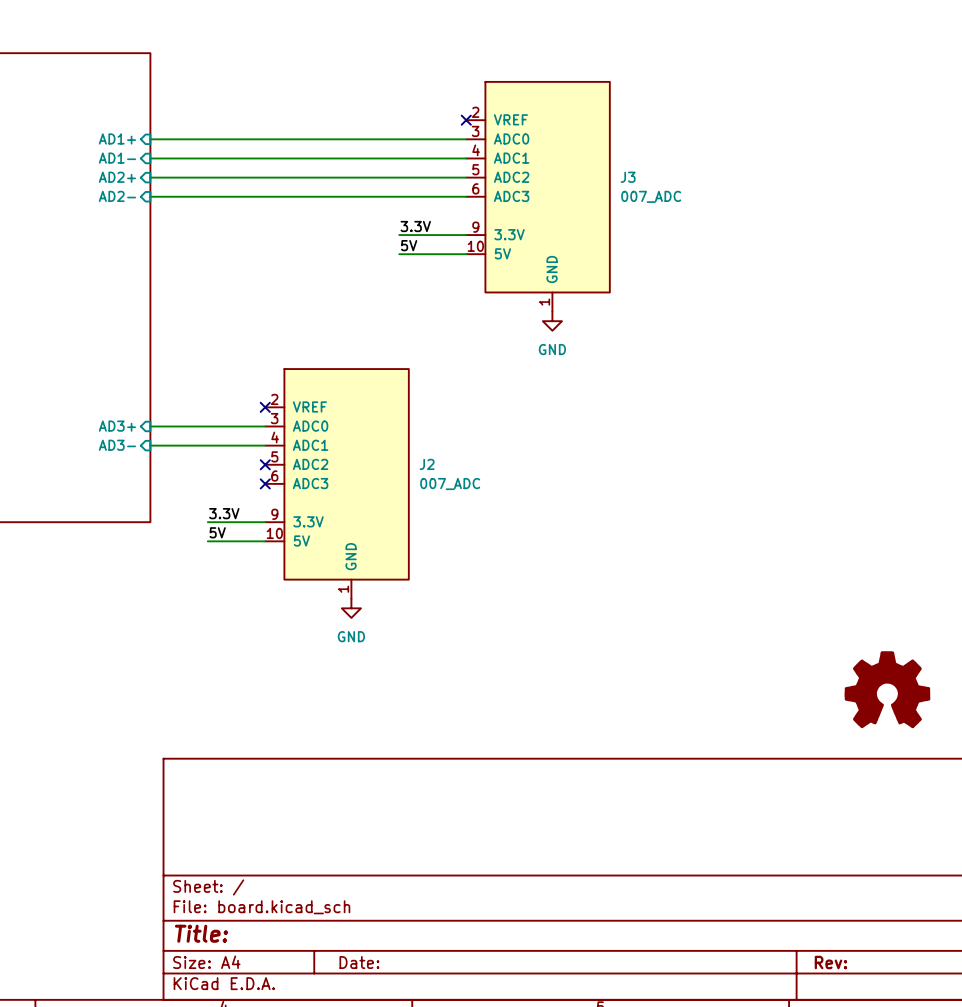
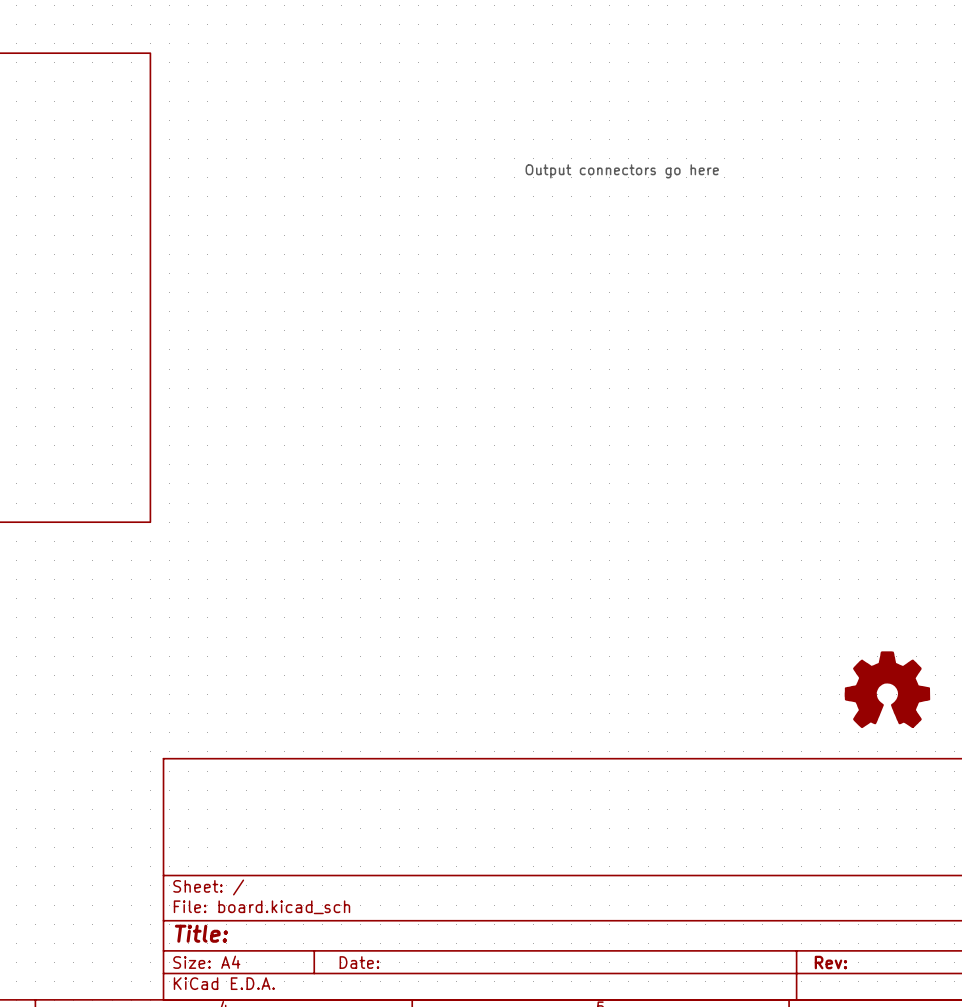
no-connect mark: (466, 120) -> none
sheet pin: AD1+ (117, 138) -> none
wire: (150, 139) (466, 139) -> none
sheet pin: AD1- (117, 158) -> none
wire: (150, 158) (466, 158) -> none
text: none -> Output connectors go here (622, 171)
sheet pin: AD2+ (117, 177) -> none
wire: (150, 177) (466, 177) -> none
sheet pin: AD2- (117, 196) -> none
wire: (150, 196) (466, 196) -> none
J3: 007_ADC (538, 196) -> none
label: 3.3V (415, 226) -> none
wire: (399, 235) (466, 235) -> none
label: 5V (409, 245) -> none
wire: (399, 254) (466, 254) -> none
power symbol: GND (552, 321) -> none
no-connect mark: (265, 407) -> none
sheet pin: AD3+ (117, 426) -> none
wire: (150, 426) (265, 426) -> none
sheet pin: AD3- (117, 445) -> none
wire: (150, 445) (265, 445) -> none
no-connect mark: (265, 464) -> none
no-connect mark: (265, 483) -> none
J2: 007_ADC (337, 483) -> none
label: 3.3V (224, 513) -> none
wire: (207, 522) (265, 522) -> none
label: 5V (217, 532) -> none
wire: (207, 541) (265, 541) -> none
power symbol: GND (351, 608) -> none

